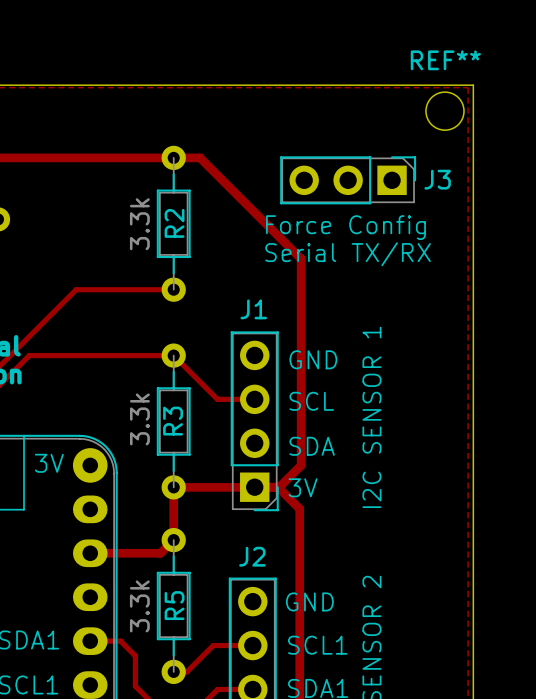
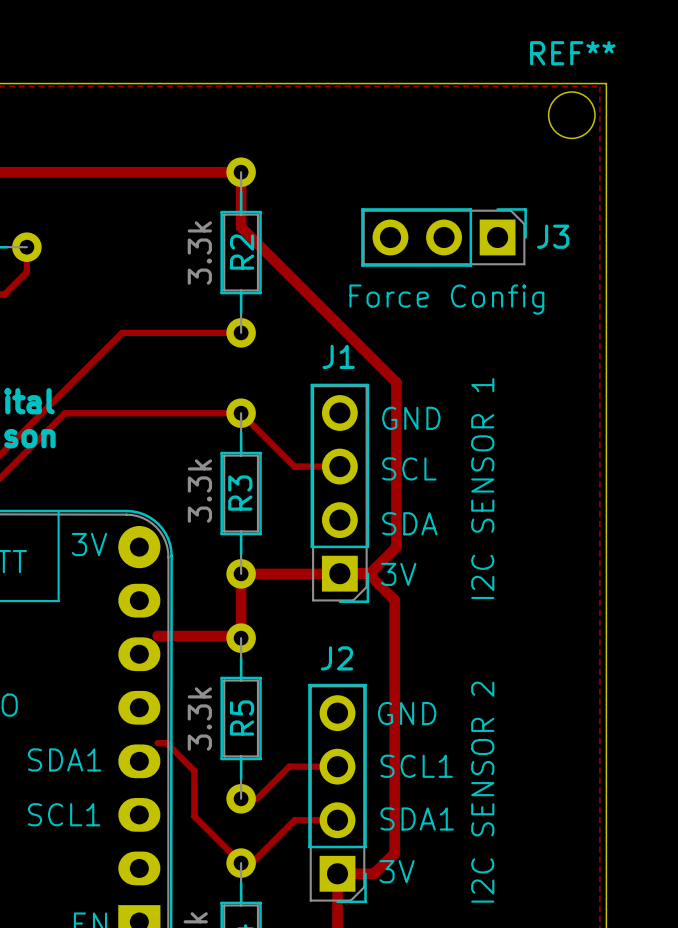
track: (173, 157) (200, 157) (301, 258) (301, 330) -> (241, 172) (241, 227) (396, 382)
J3 position: (348, 180) -> (444, 237)
text position: Force Config (345, 227) -> Force Config (446, 299)
text: Serial TX/RX (348, 254) -> none
track: (173, 540) (160, 553) (90, 553) -> (241, 638) (238, 635) (157, 635)
track: (90, 641) (120, 641) (135, 655) -> (157, 743) (166, 743) (194, 770) (194, 779)

